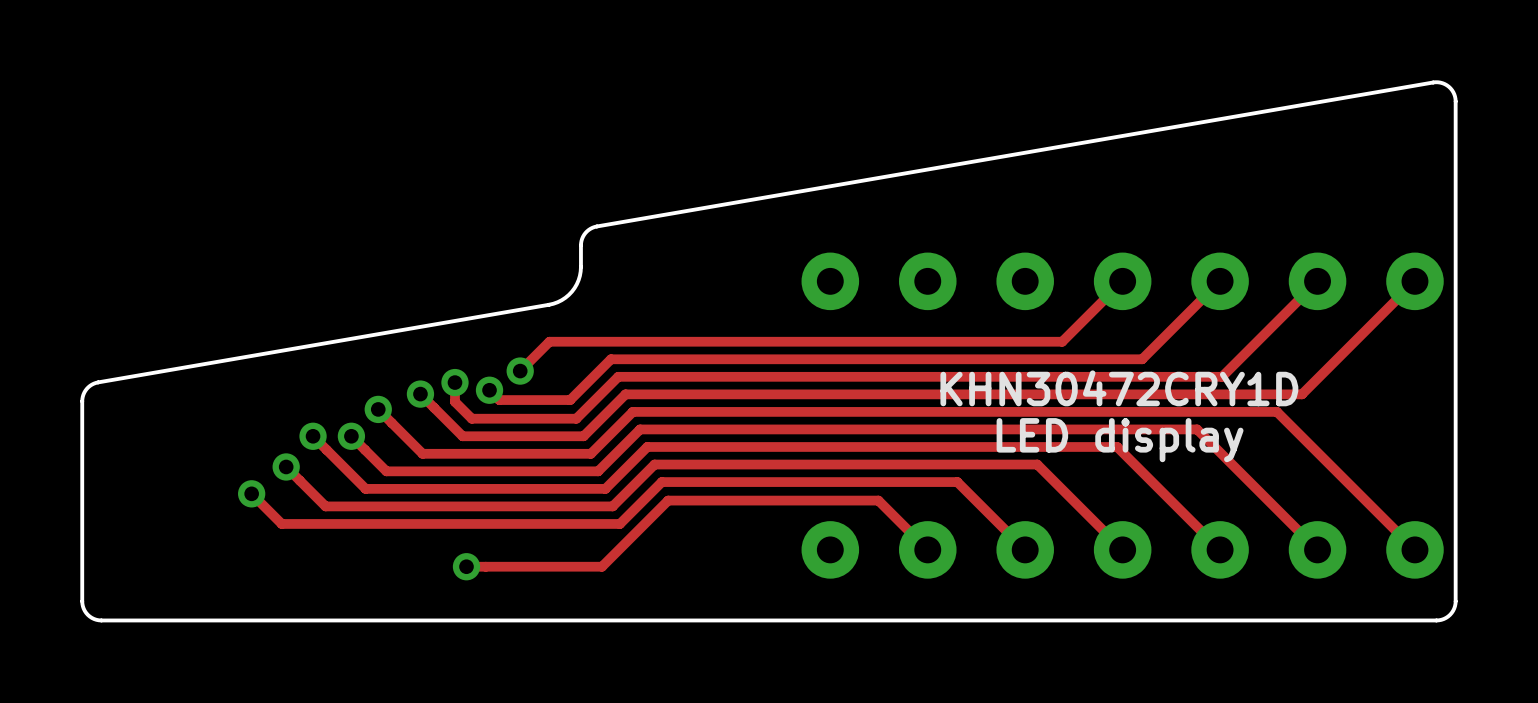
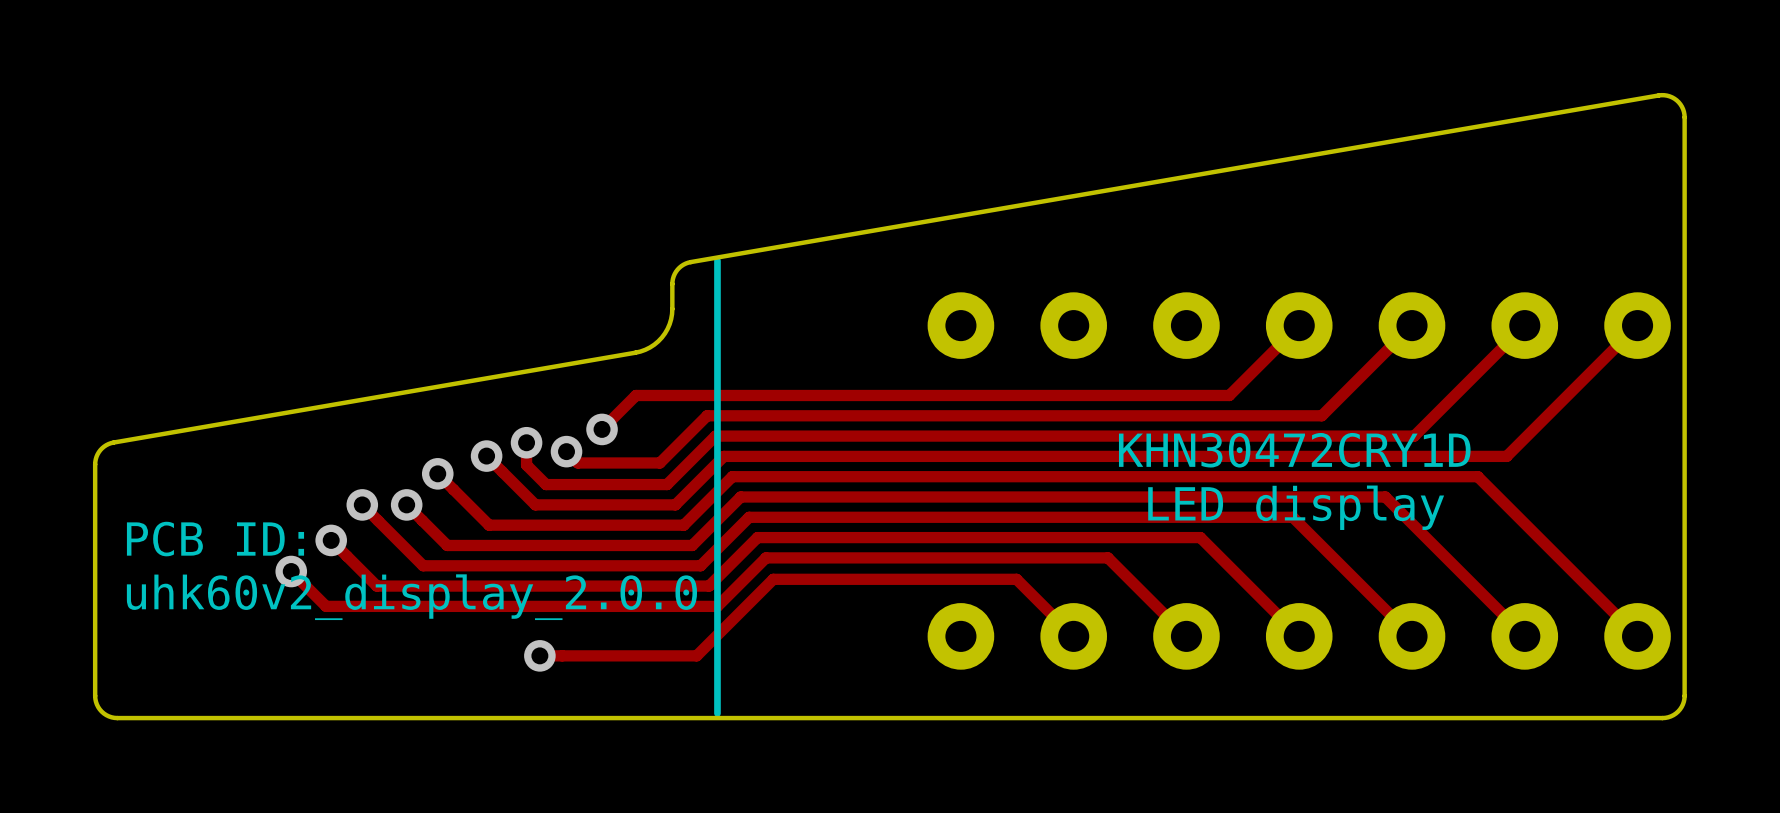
line: none -> (717, 260) (717, 713)
text: none -> PCB ID: (215, 539)
text: none -> uhk60v2_display_2.0.0 (411, 597)

